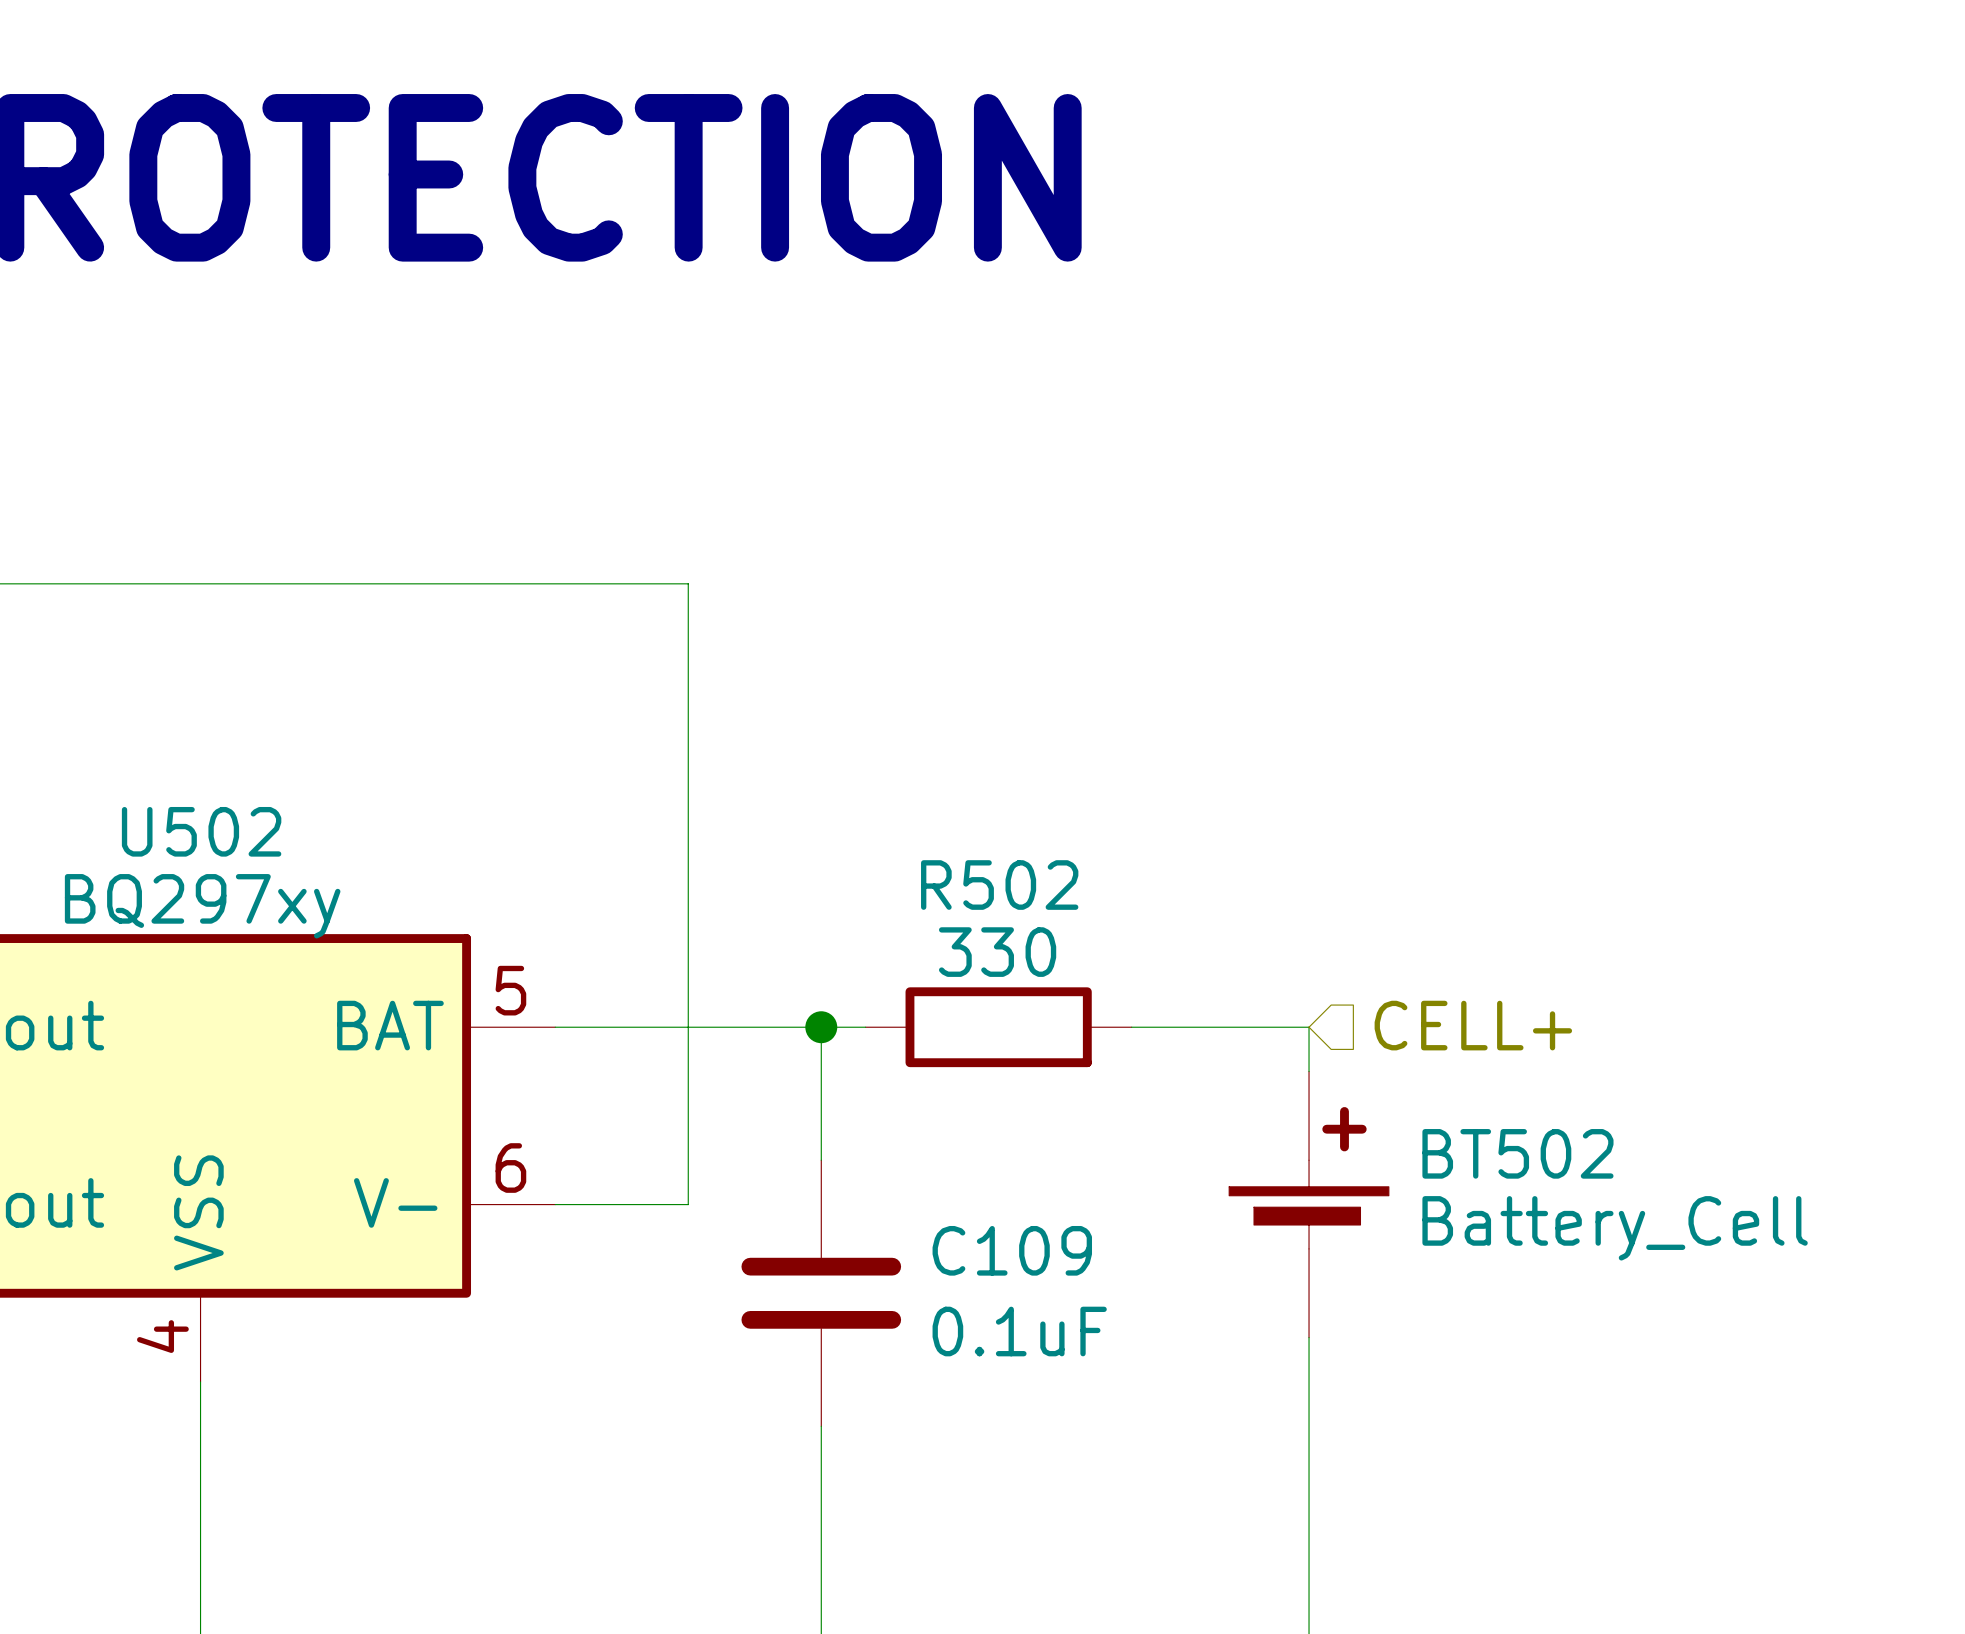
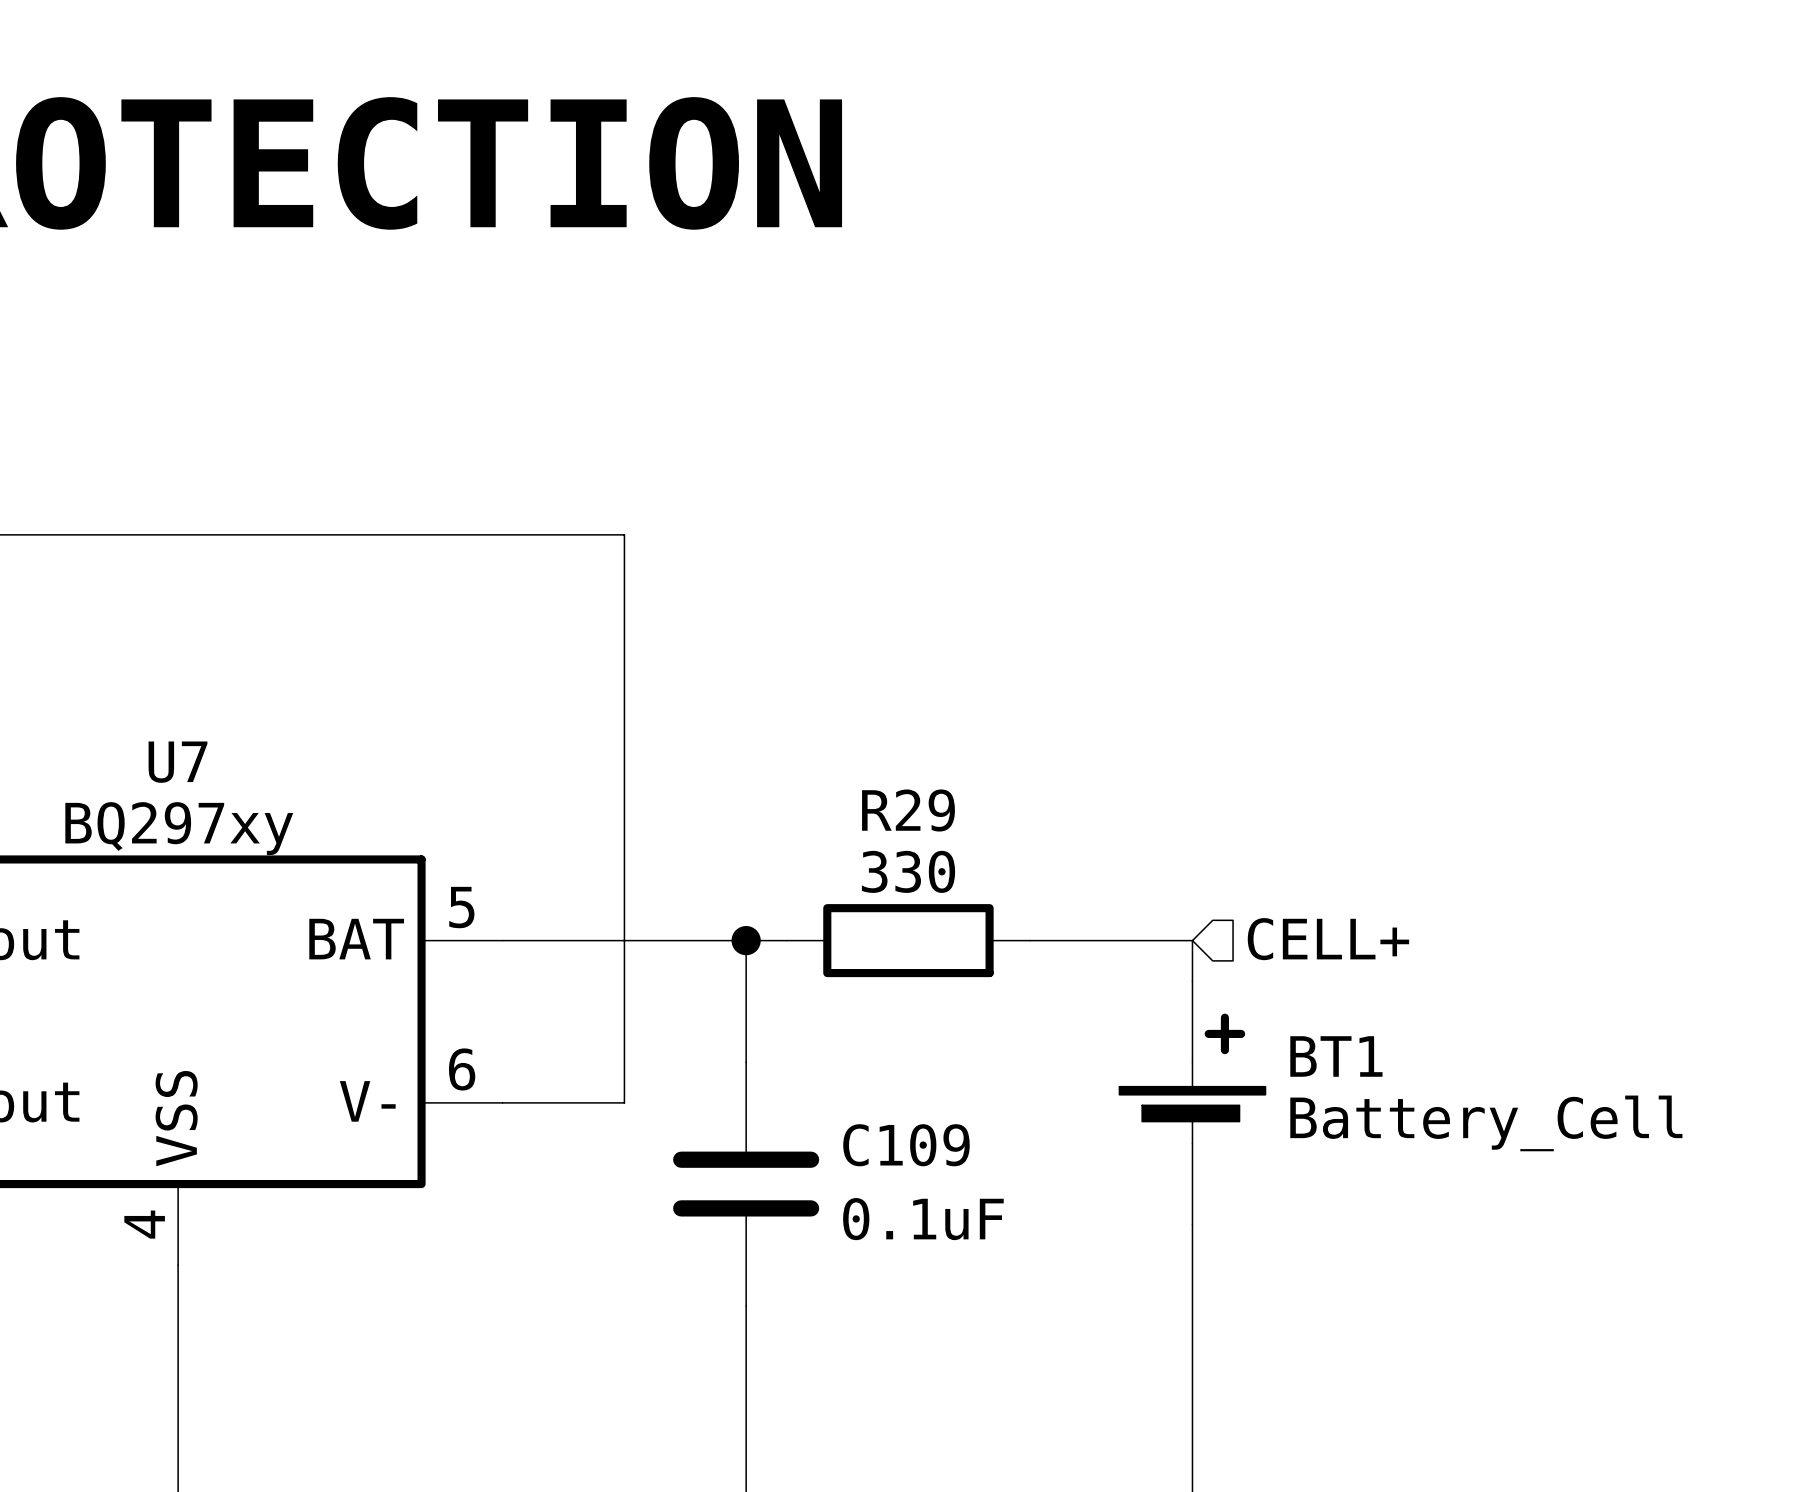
U502 name: U502 (201, 831) -> U7 (178, 762)
R502 name: R502 (999, 885) -> R29 (908, 810)
BT502 name: BT502 (1517, 1153) -> BT1 (1336, 1056)

